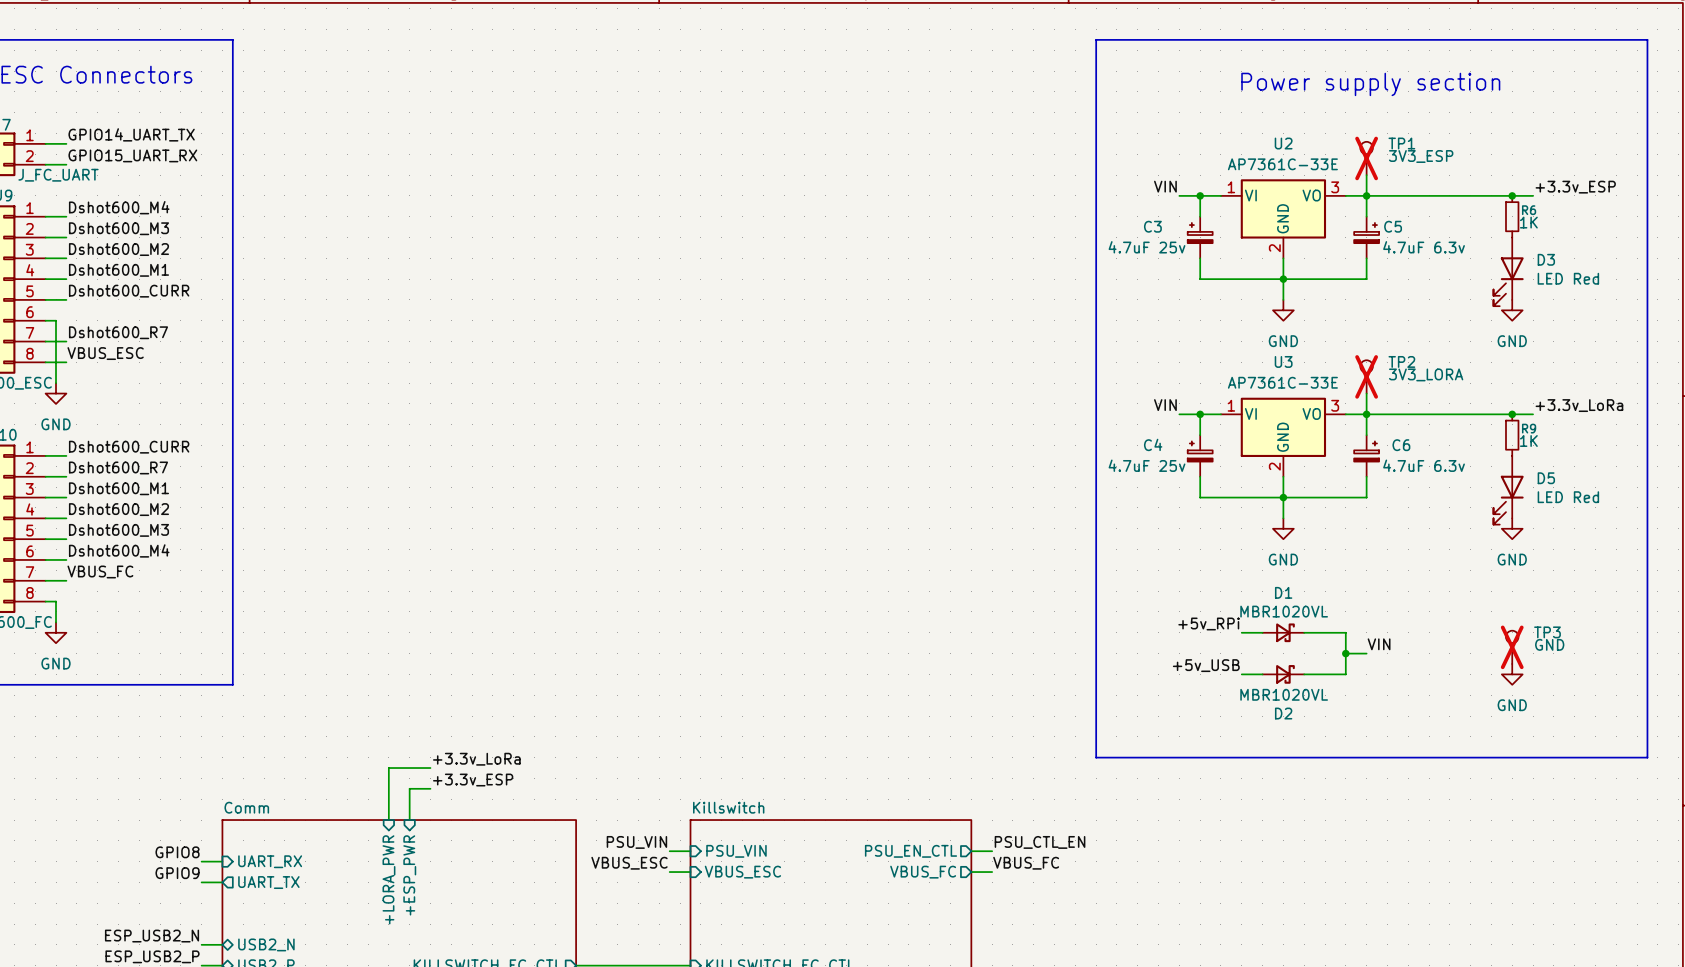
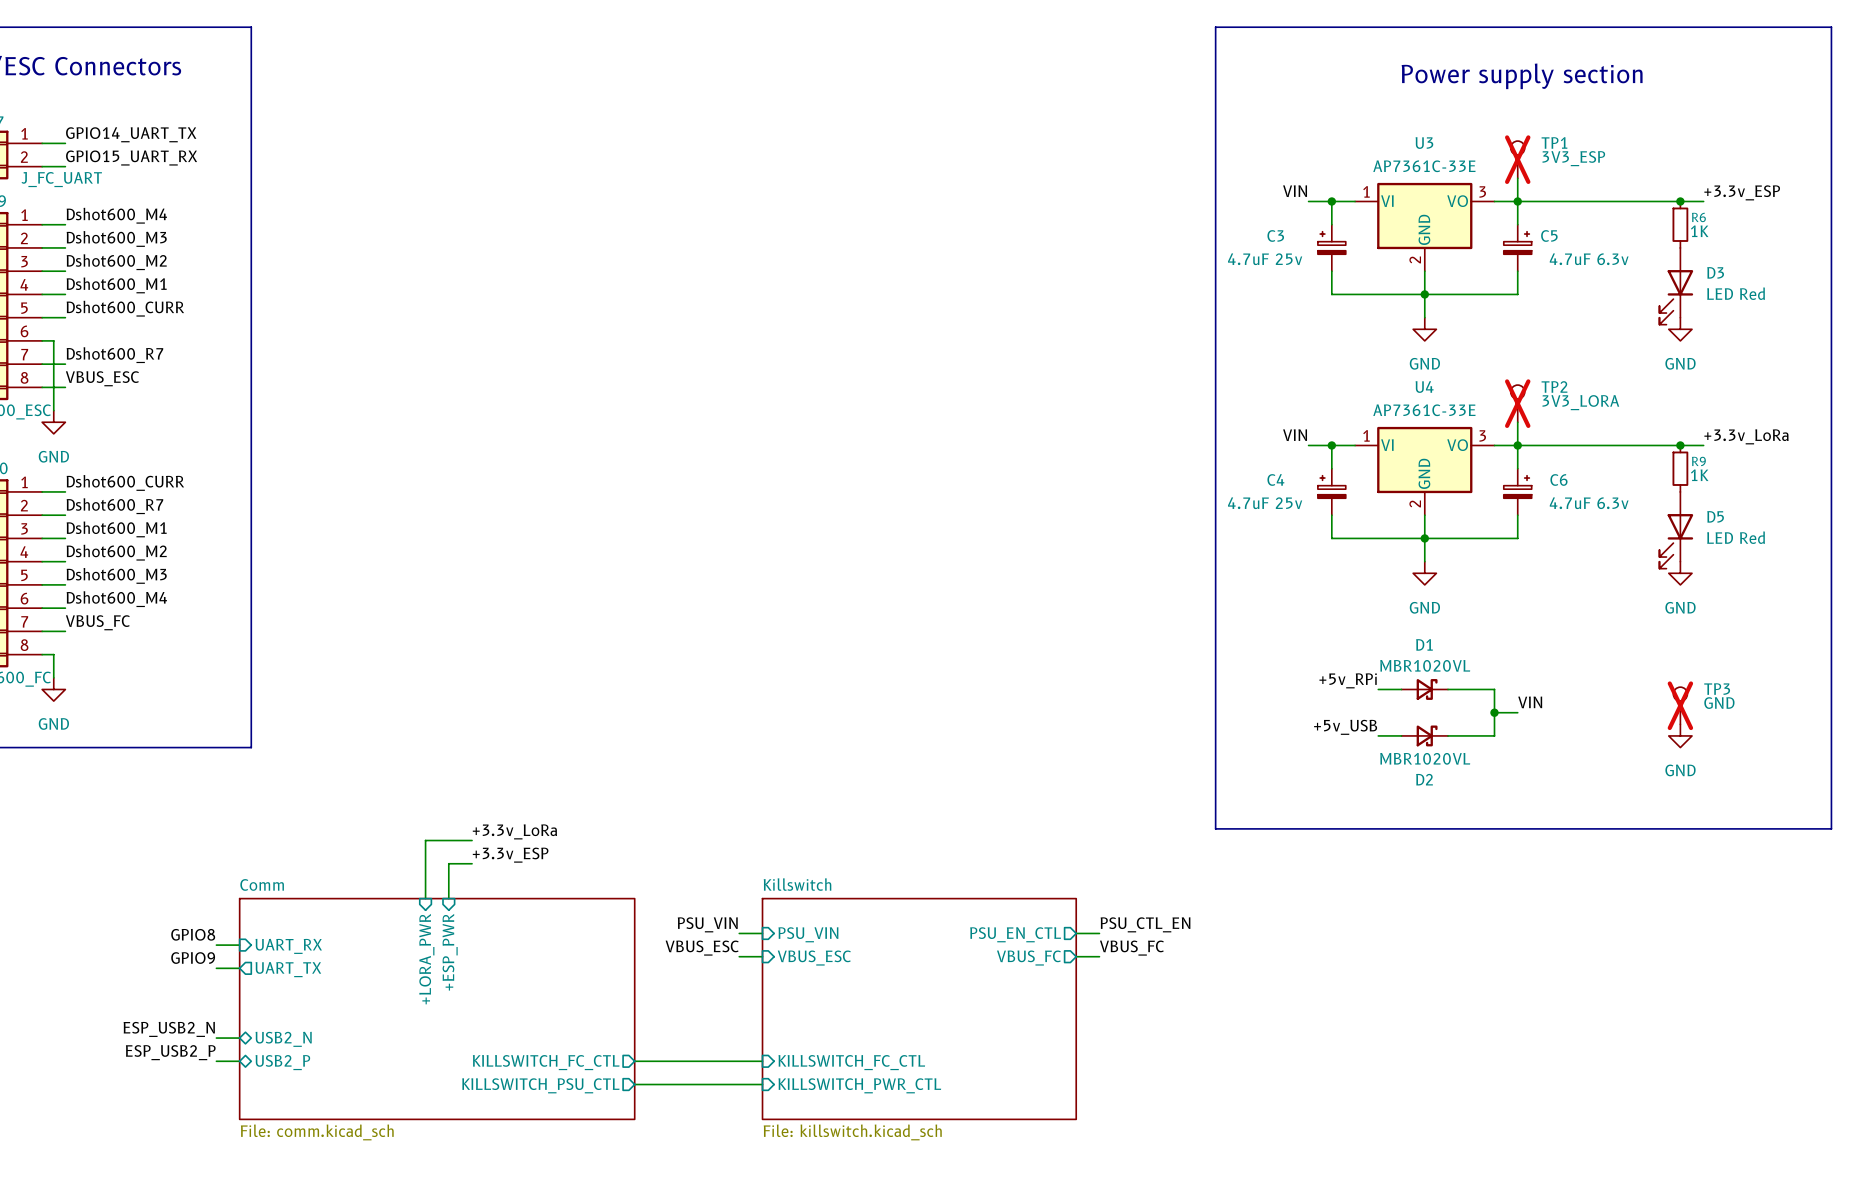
U2 name: U2 (1283, 143) -> U3 (1424, 143)
U3 name: U3 (1283, 361) -> U4 (1424, 387)

